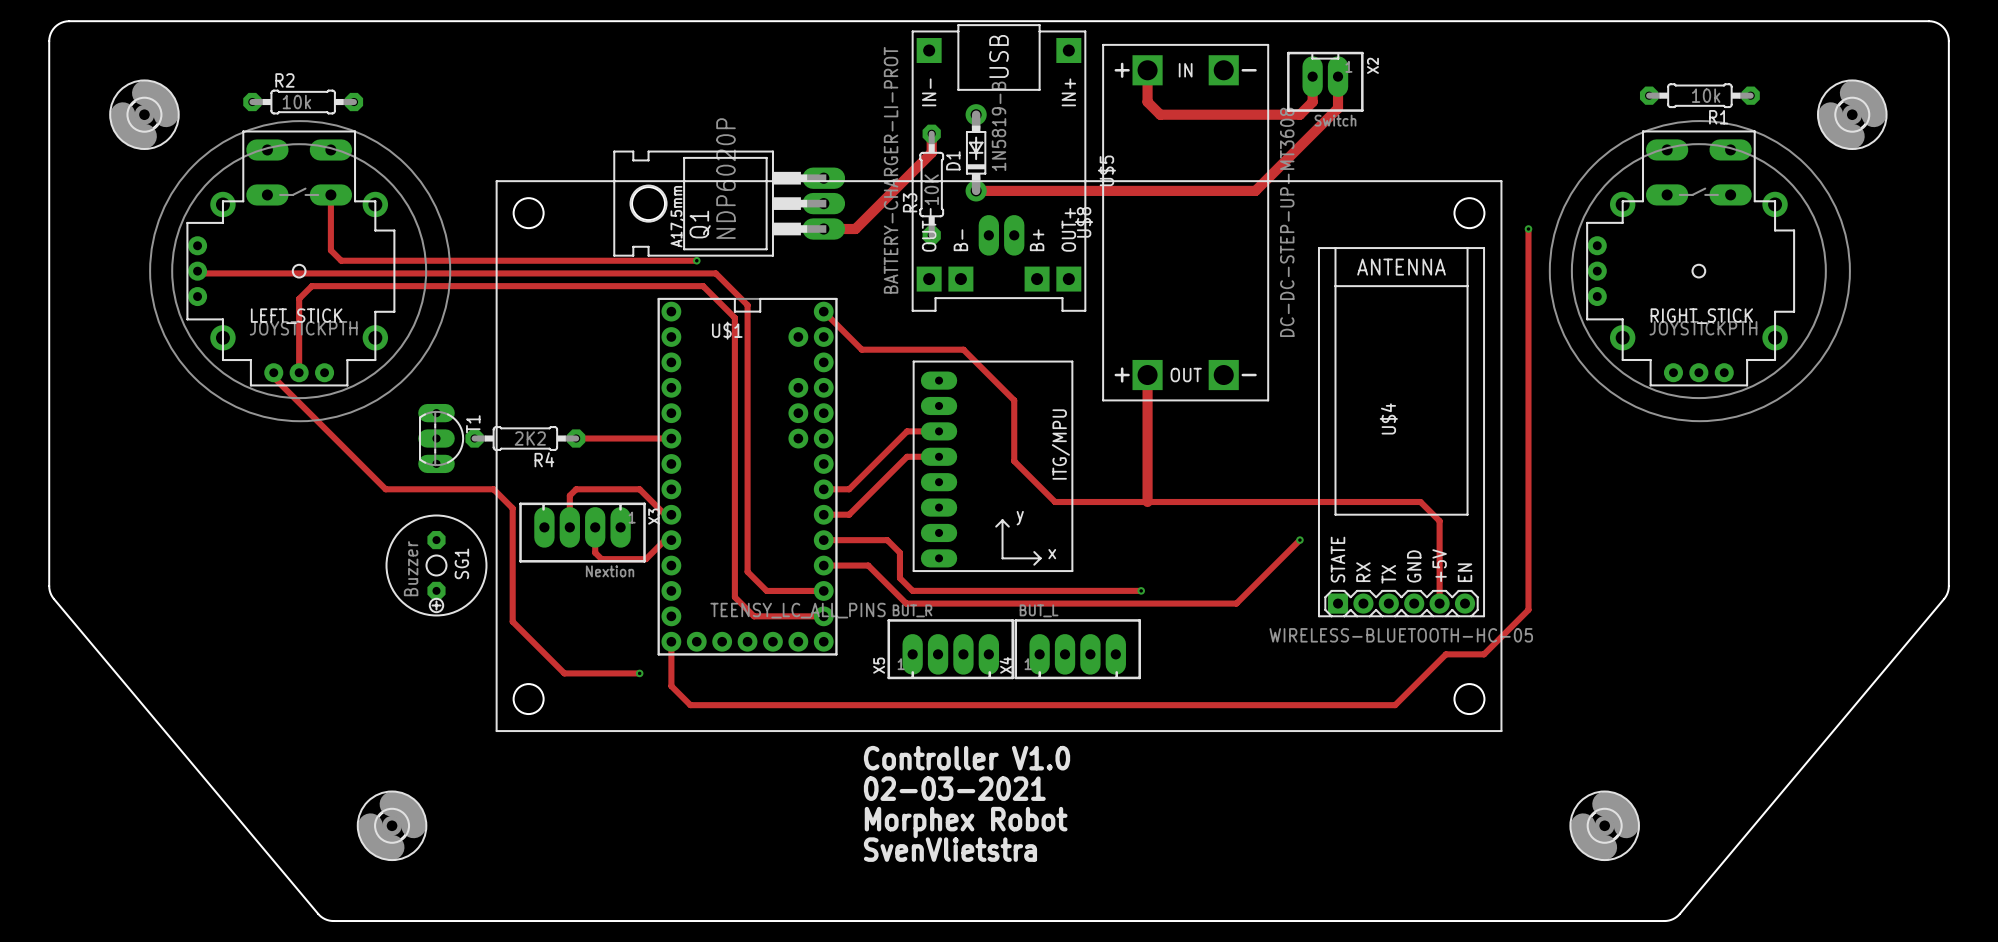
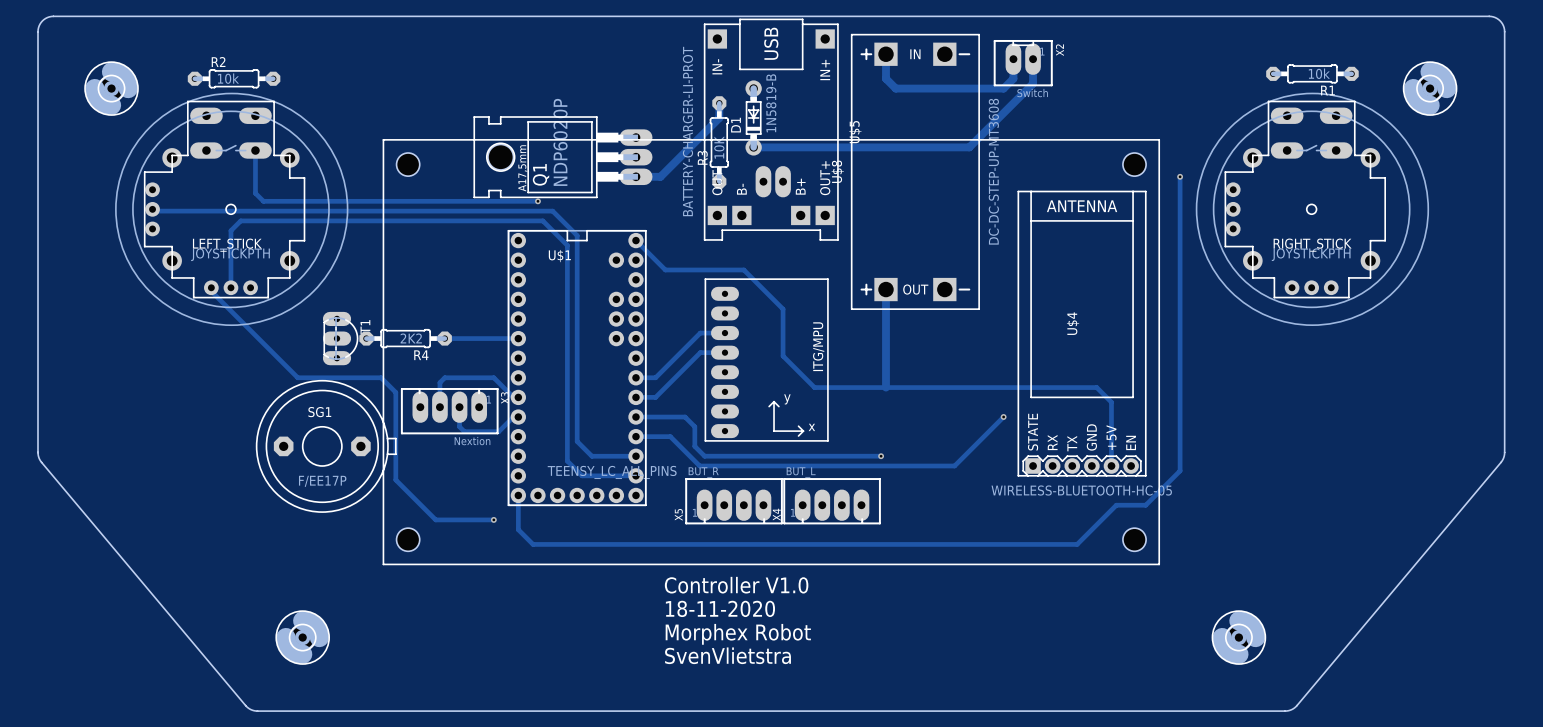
SG1 footprint: [385, 514, 488, 617] -> [256, 380, 397, 513]
SG1 name position: SG1 (461, 563) -> SG1 (319, 412)
SG1 value: Buzzer (411, 568) -> F/EE17P (322, 481)
text: 02-03-2021 (954, 788) -> 18-11-2020 (720, 608)

